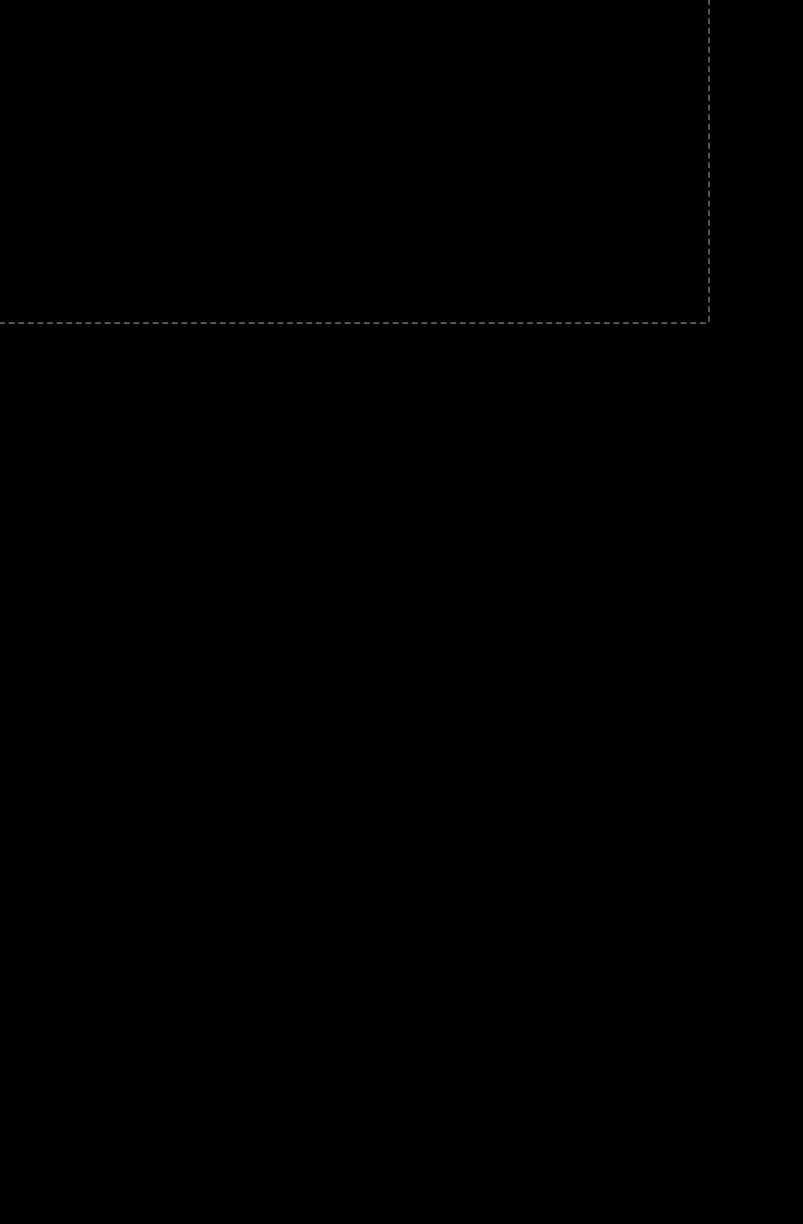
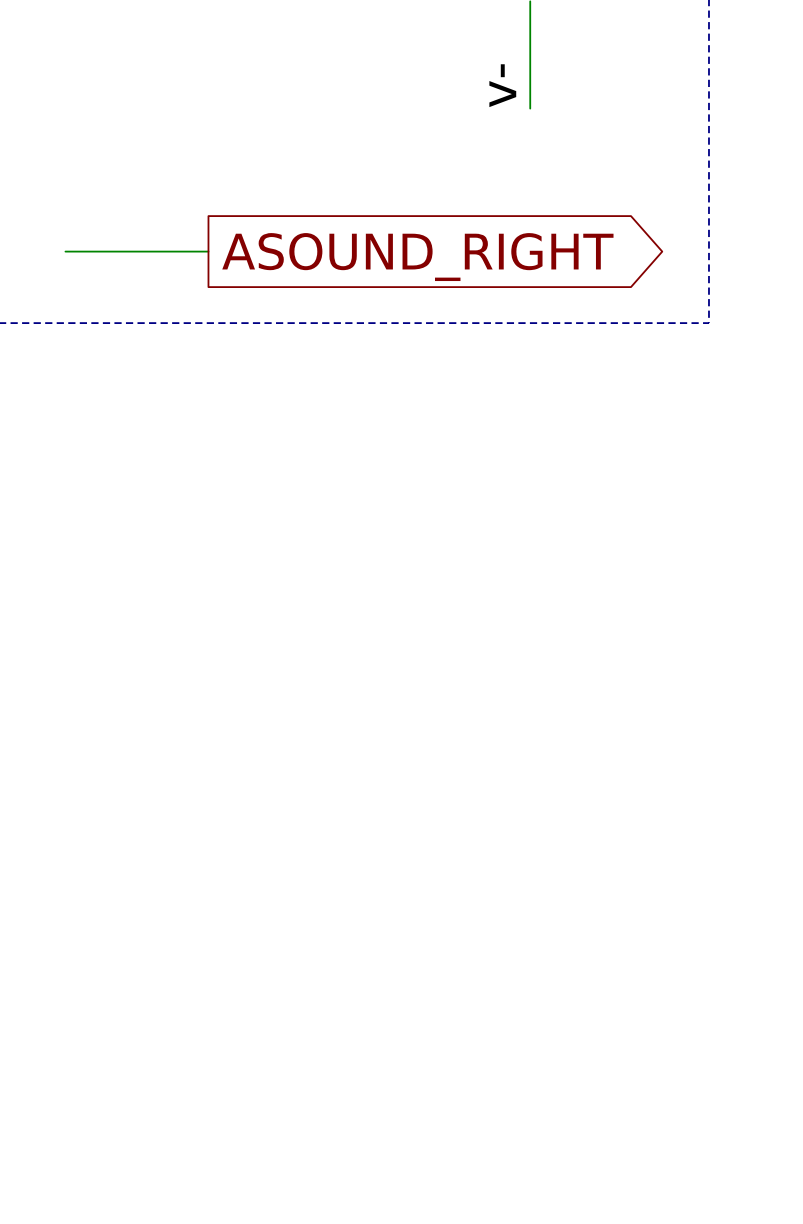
wire: none -> (530, 1) (530, 108)
label: none -> v- (502, 85)
wire: none -> (65, 251) (208, 251)
global label: none -> ASOUND_RIGHT (417, 257)

